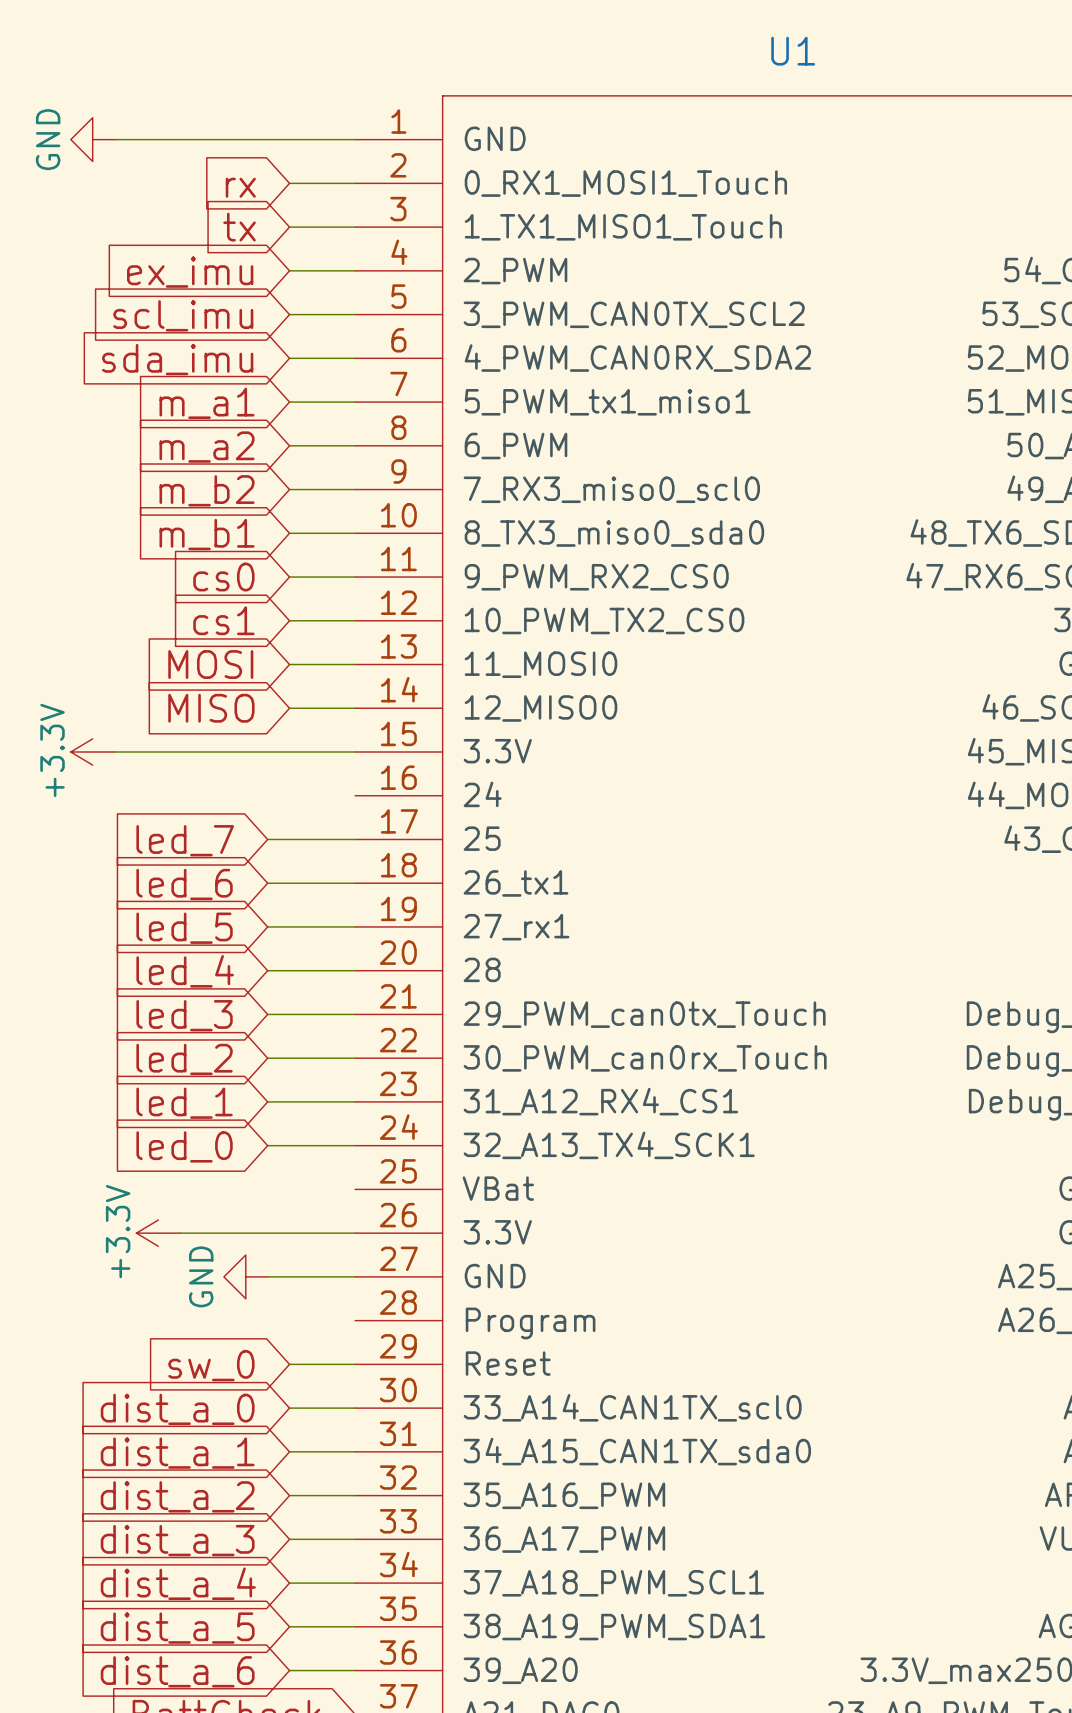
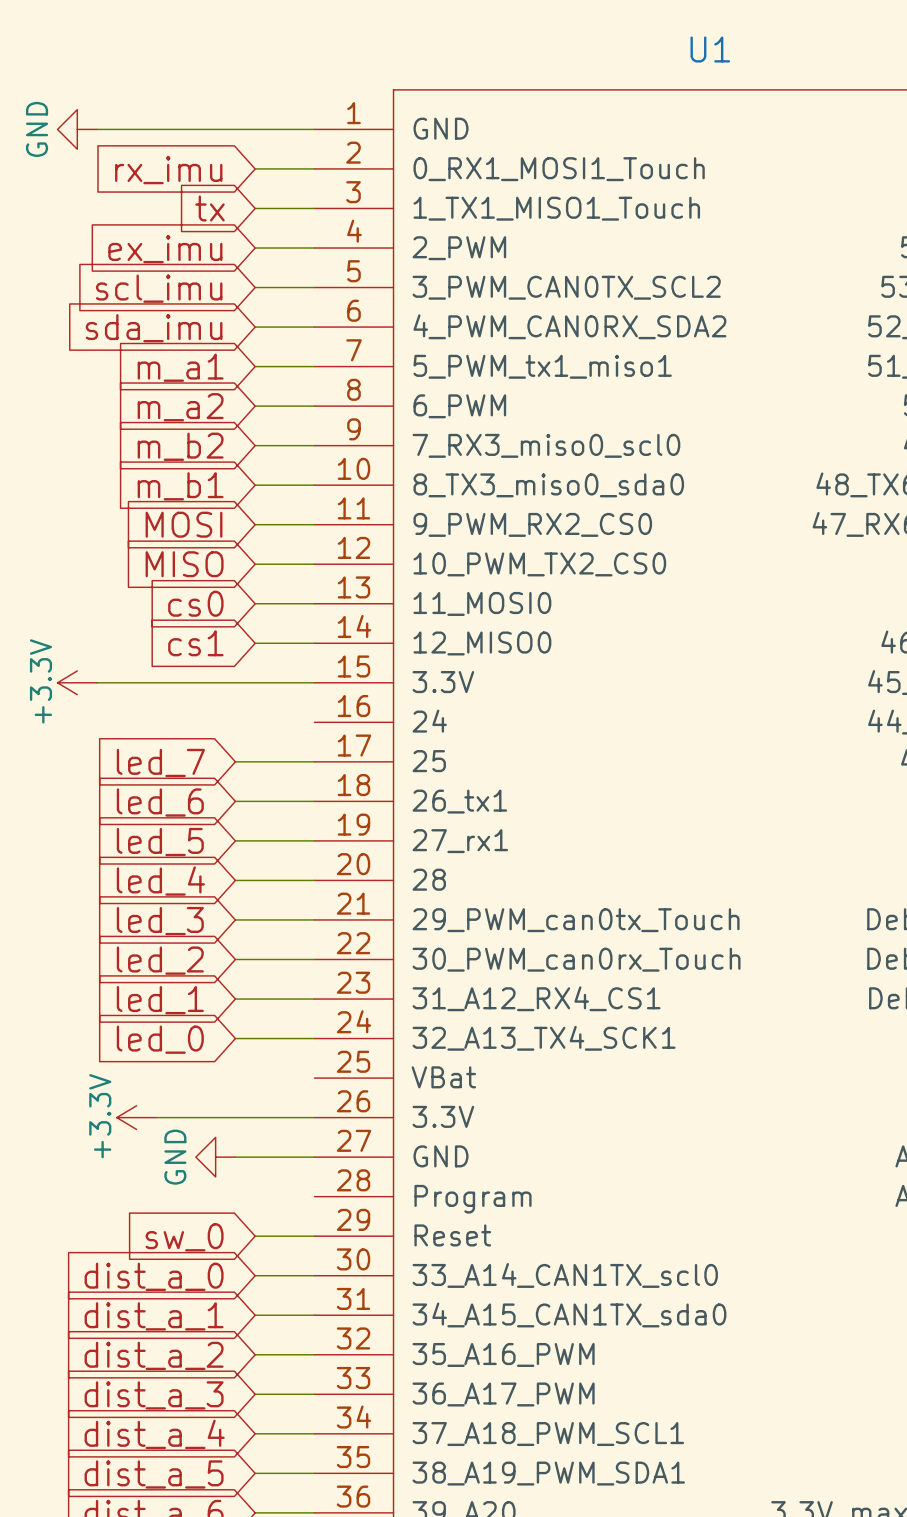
global label: rx (240, 187) -> rx_imu (168, 170)
global label: cs0 (223, 577) -> MOSI (184, 524)
global label: cs1 (223, 620) -> MISO (184, 564)
global label: MOSI (210, 664) -> cs0 (195, 603)
global label: MISO (211, 708) -> cs1 (195, 643)

